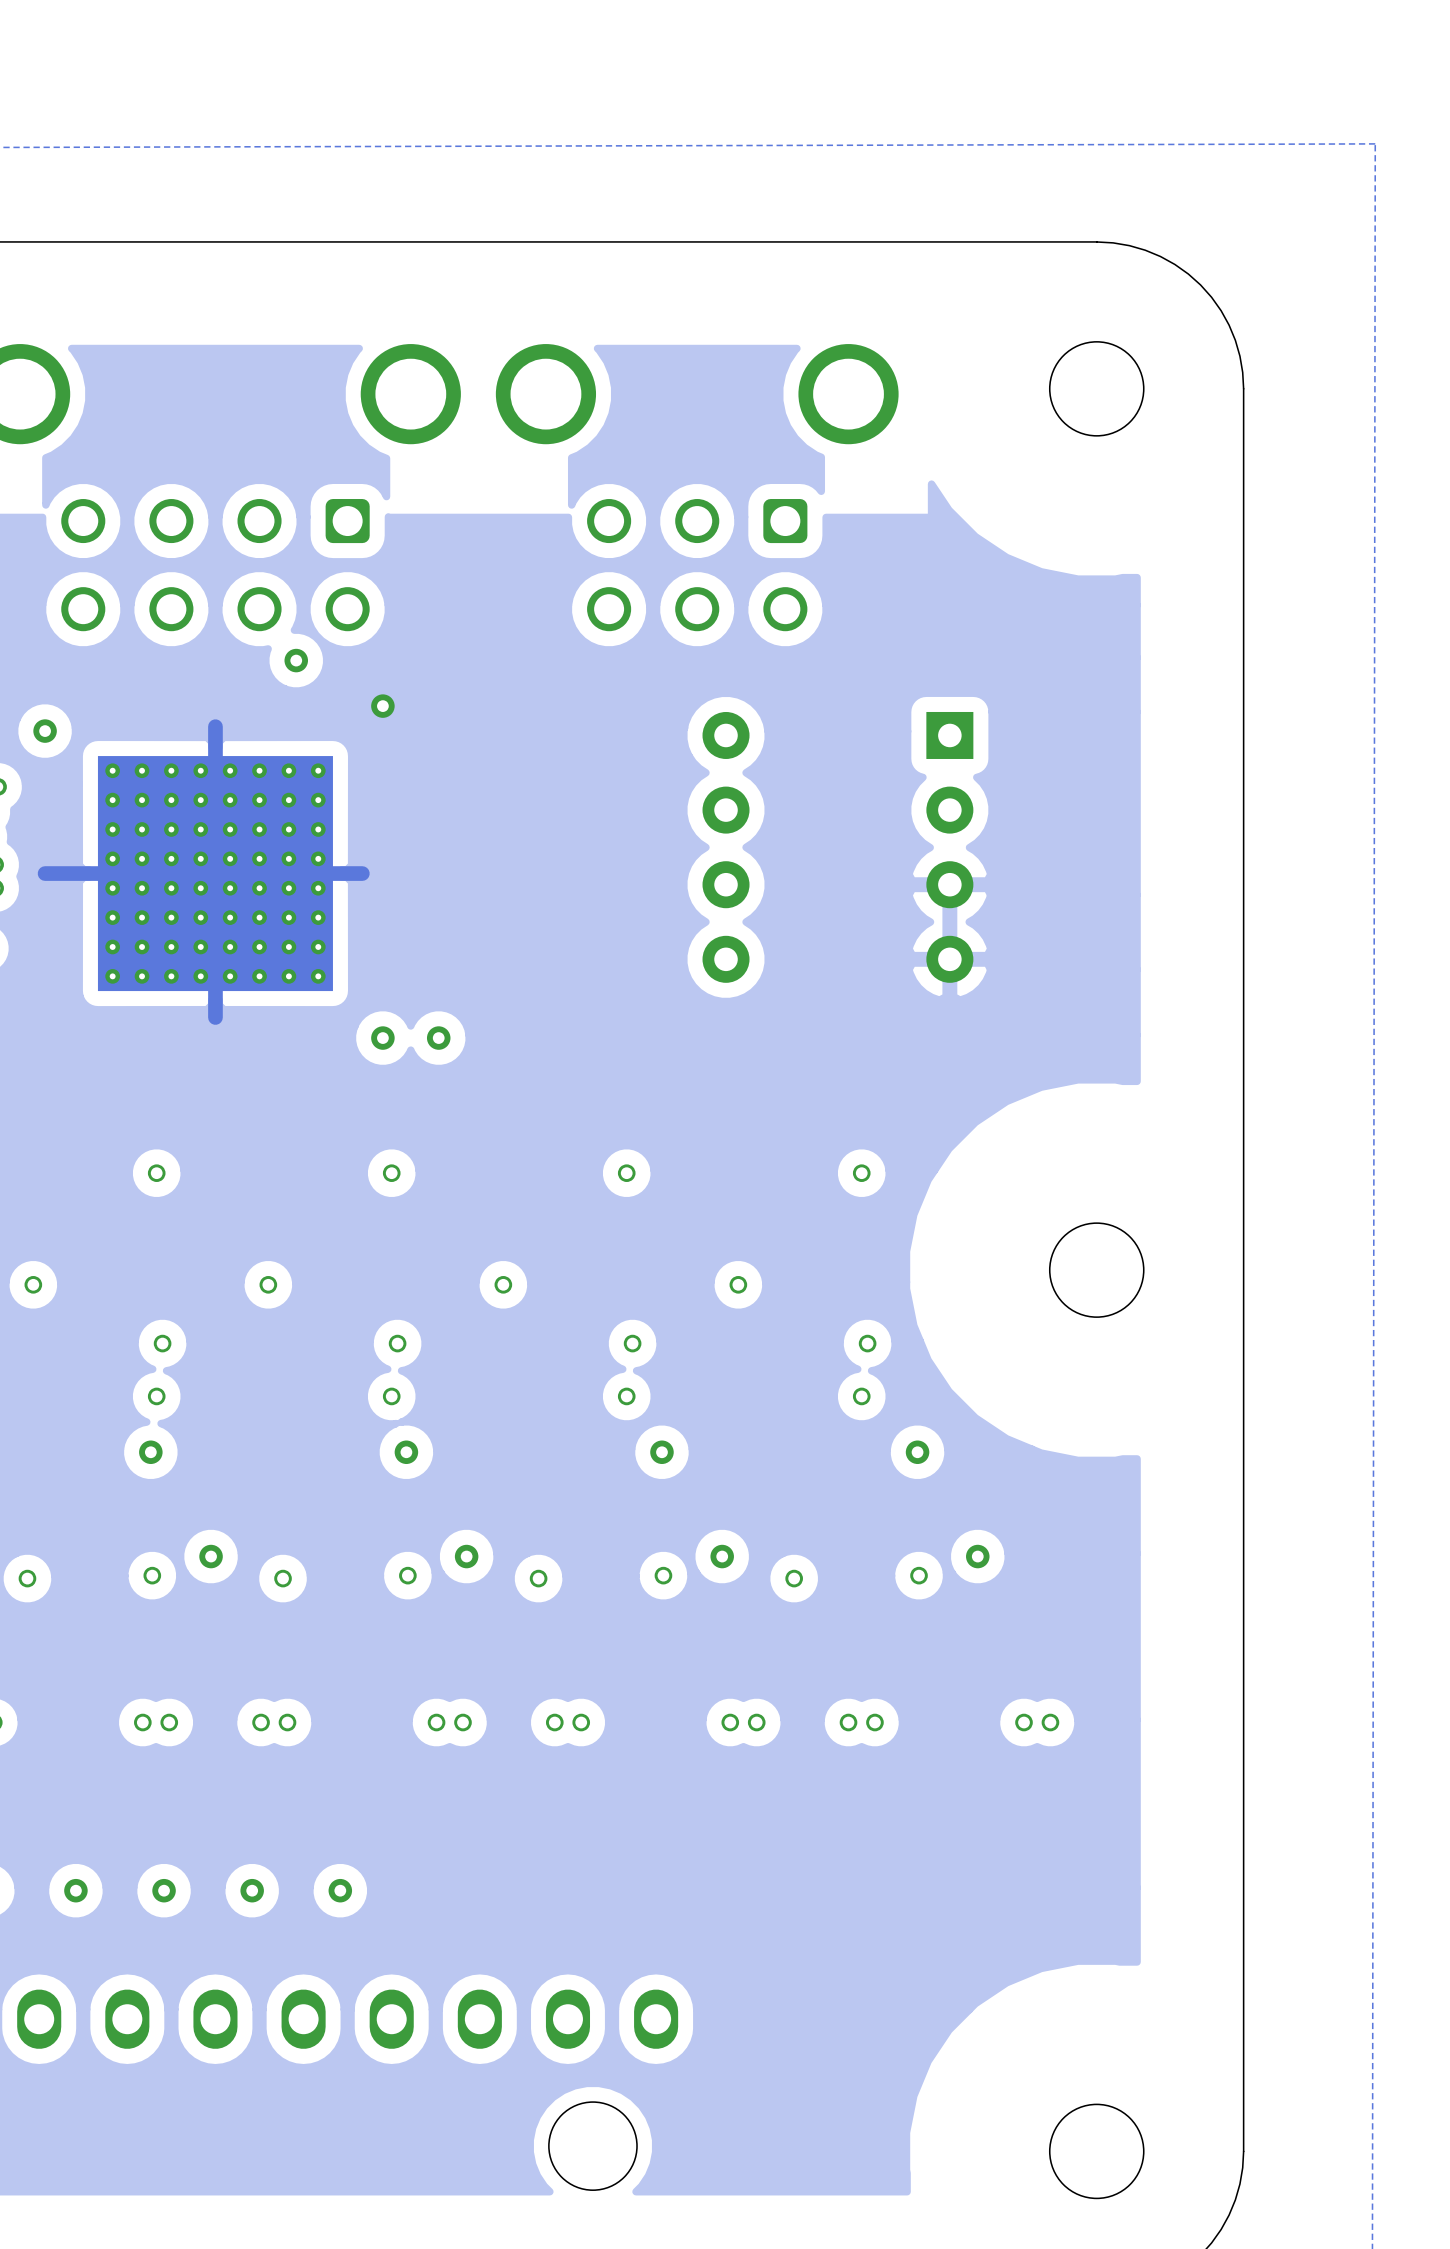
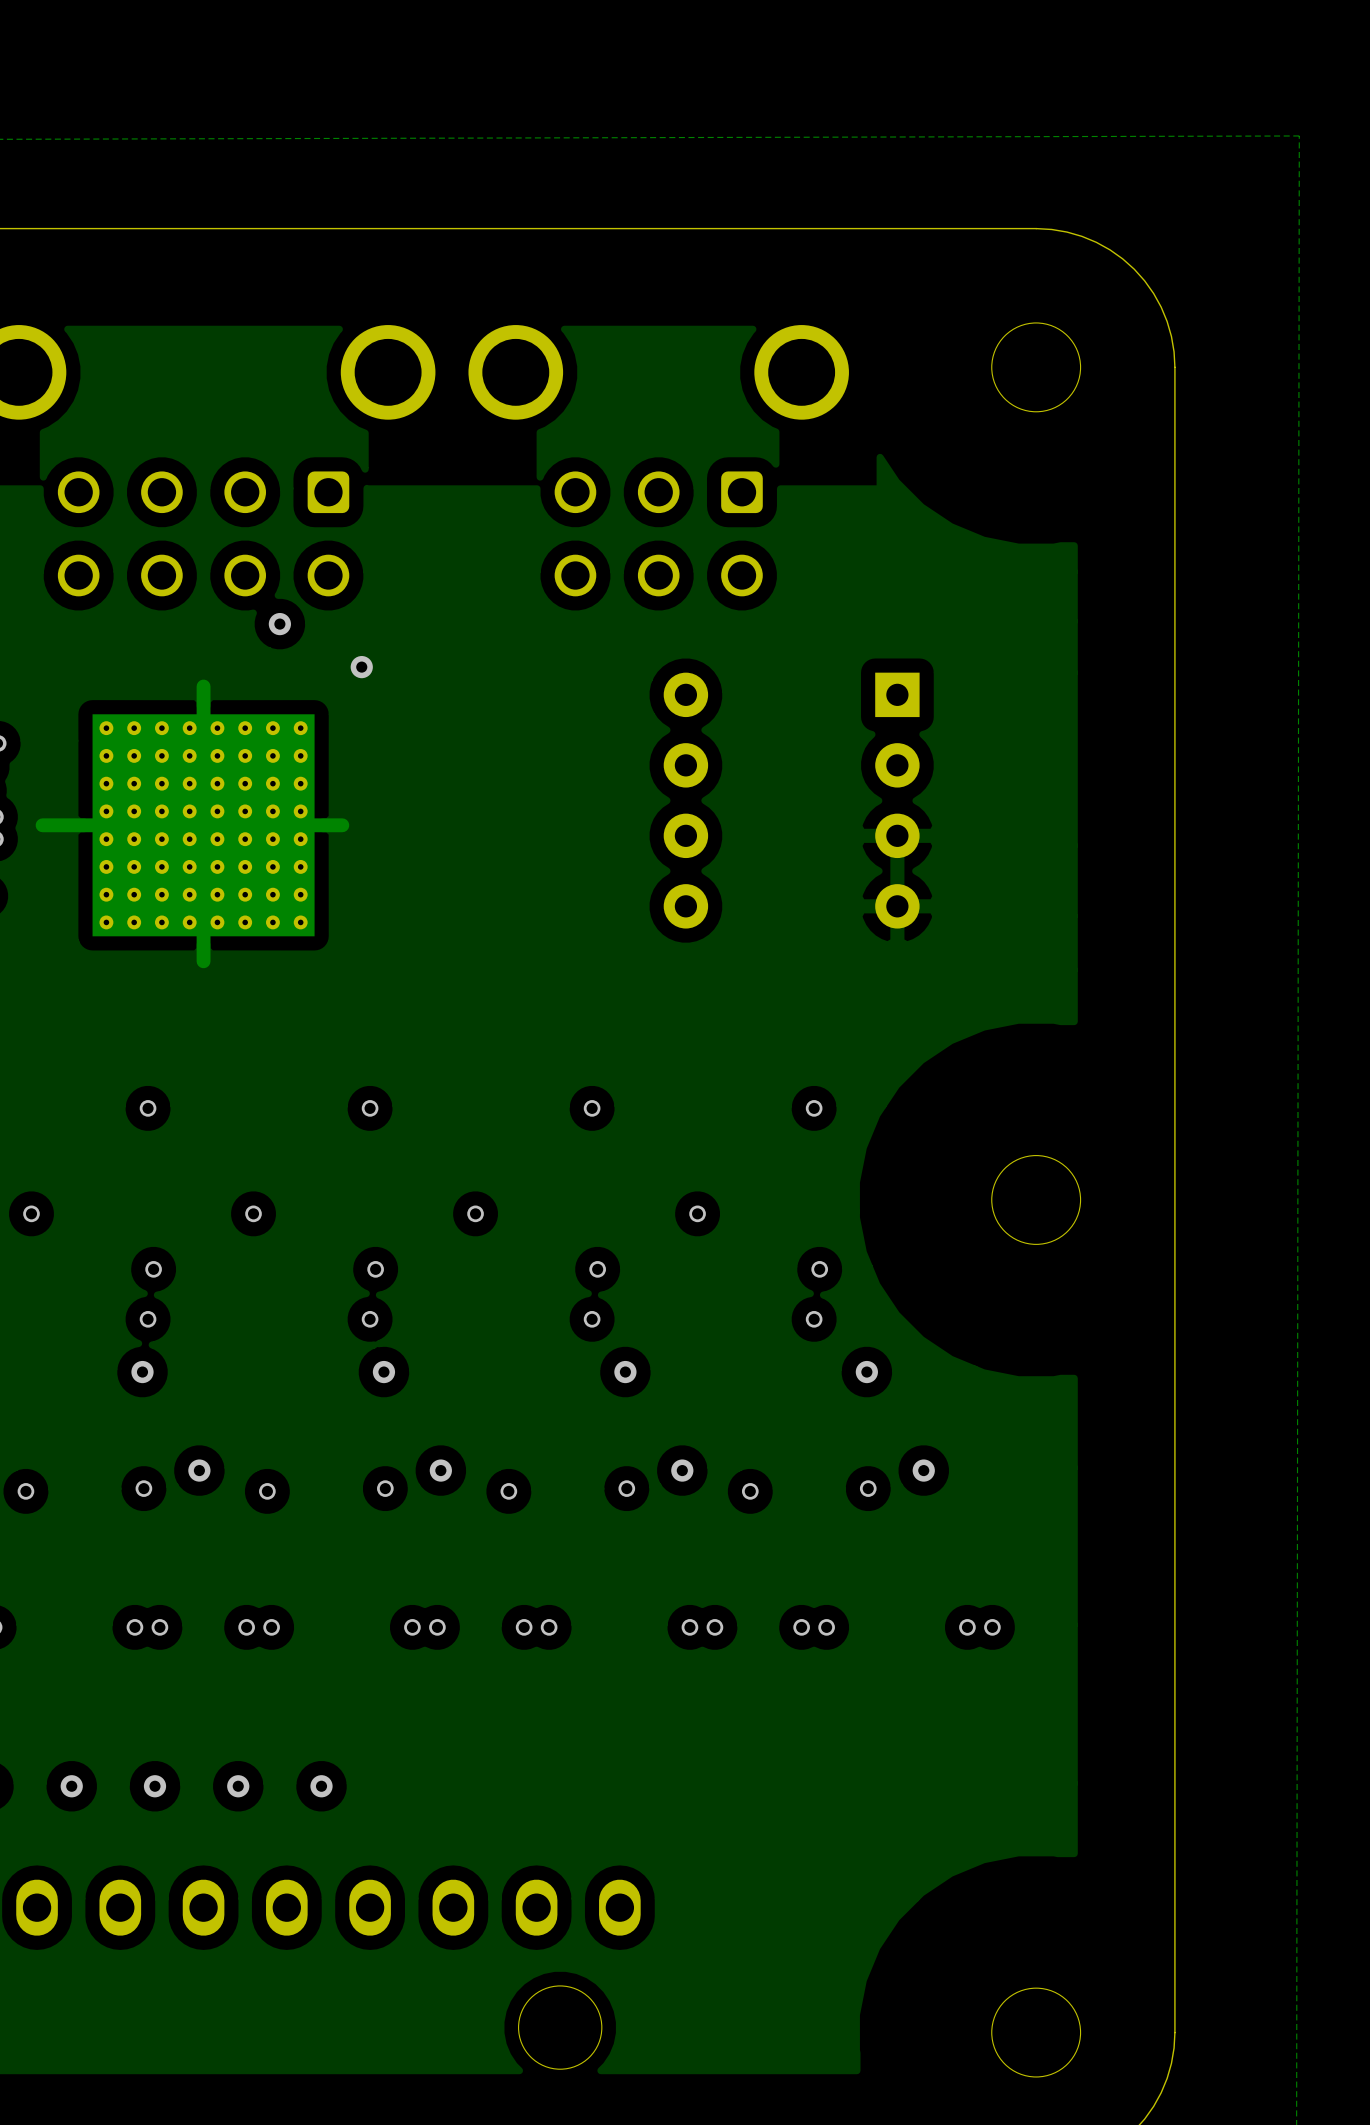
via: (45, 731) -> none
via: (382, 1038) -> none
via: (438, 1038) -> none

